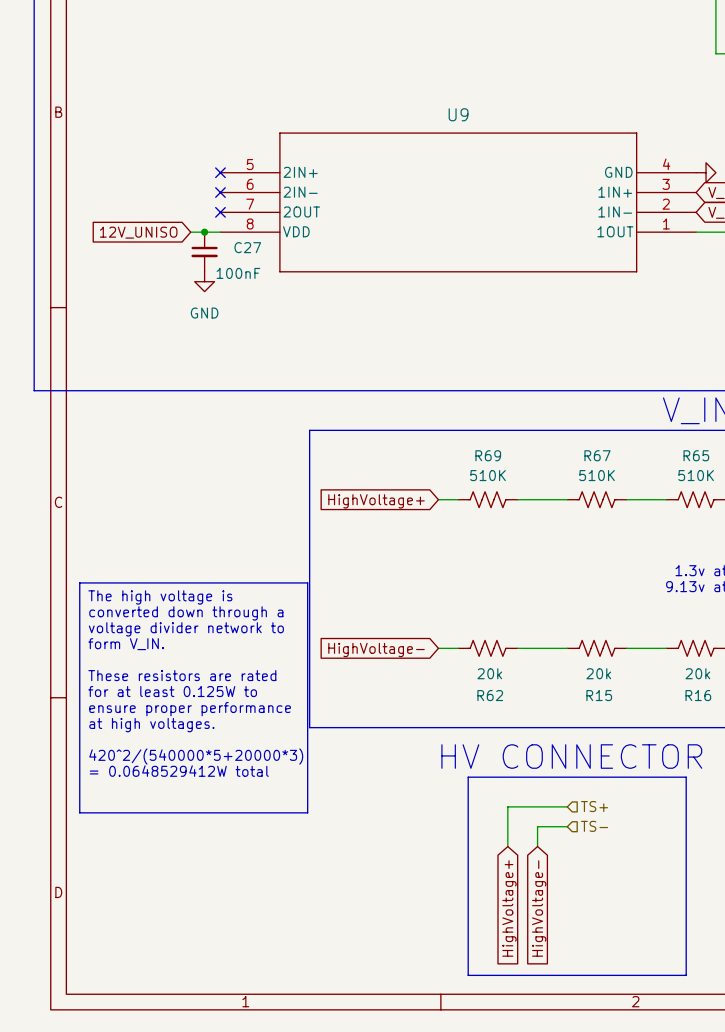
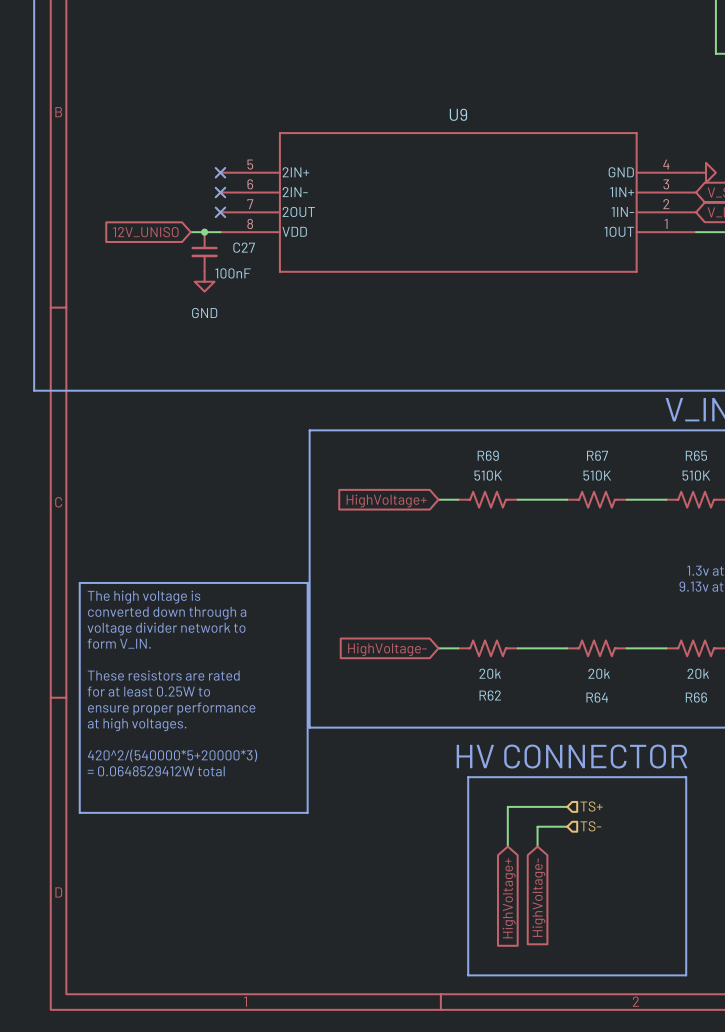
text: for at least 0.125W to (172, 691) -> for at least 0.25W to (148, 691)
R15 name: R15 (599, 695) -> R64 (597, 697)
R16 name: R16 (698, 695) -> R66 (696, 697)

